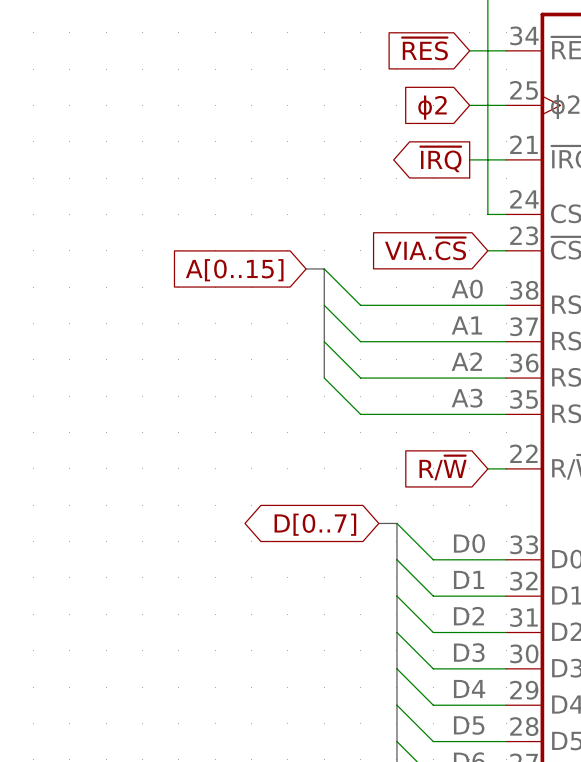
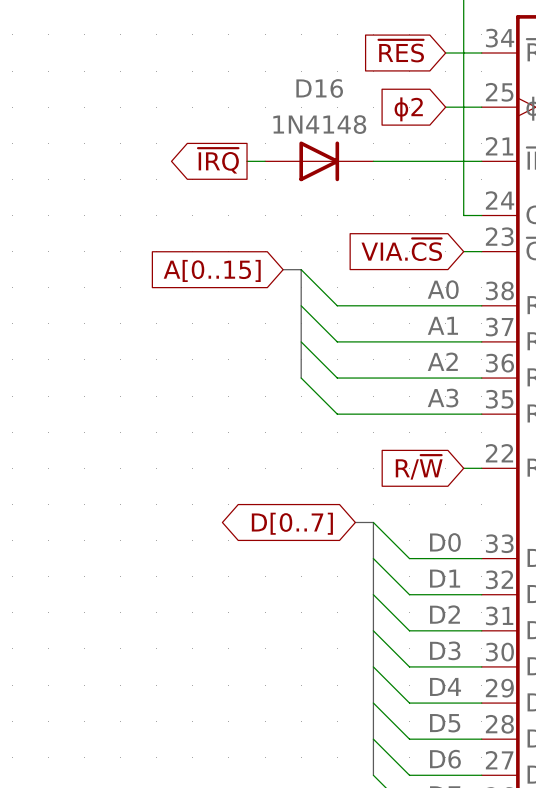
wire: none -> (247, 161) (265, 161)
D16: none -> 1N4148 (319, 161)
wire: none -> (373, 161) (445, 161)
global label position: ~{IRQ} (440, 159) -> ~{IRQ} (218, 160)

